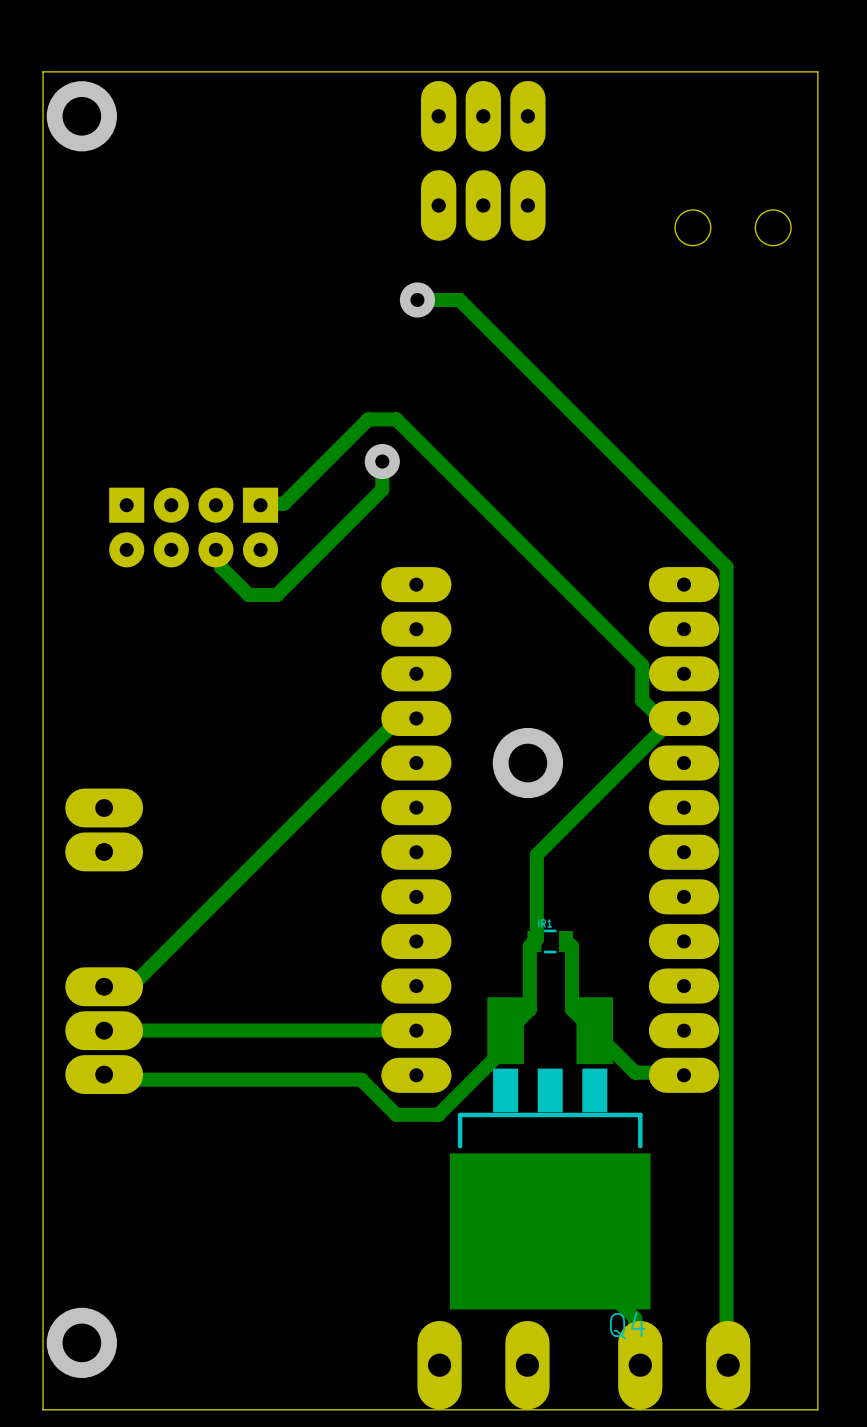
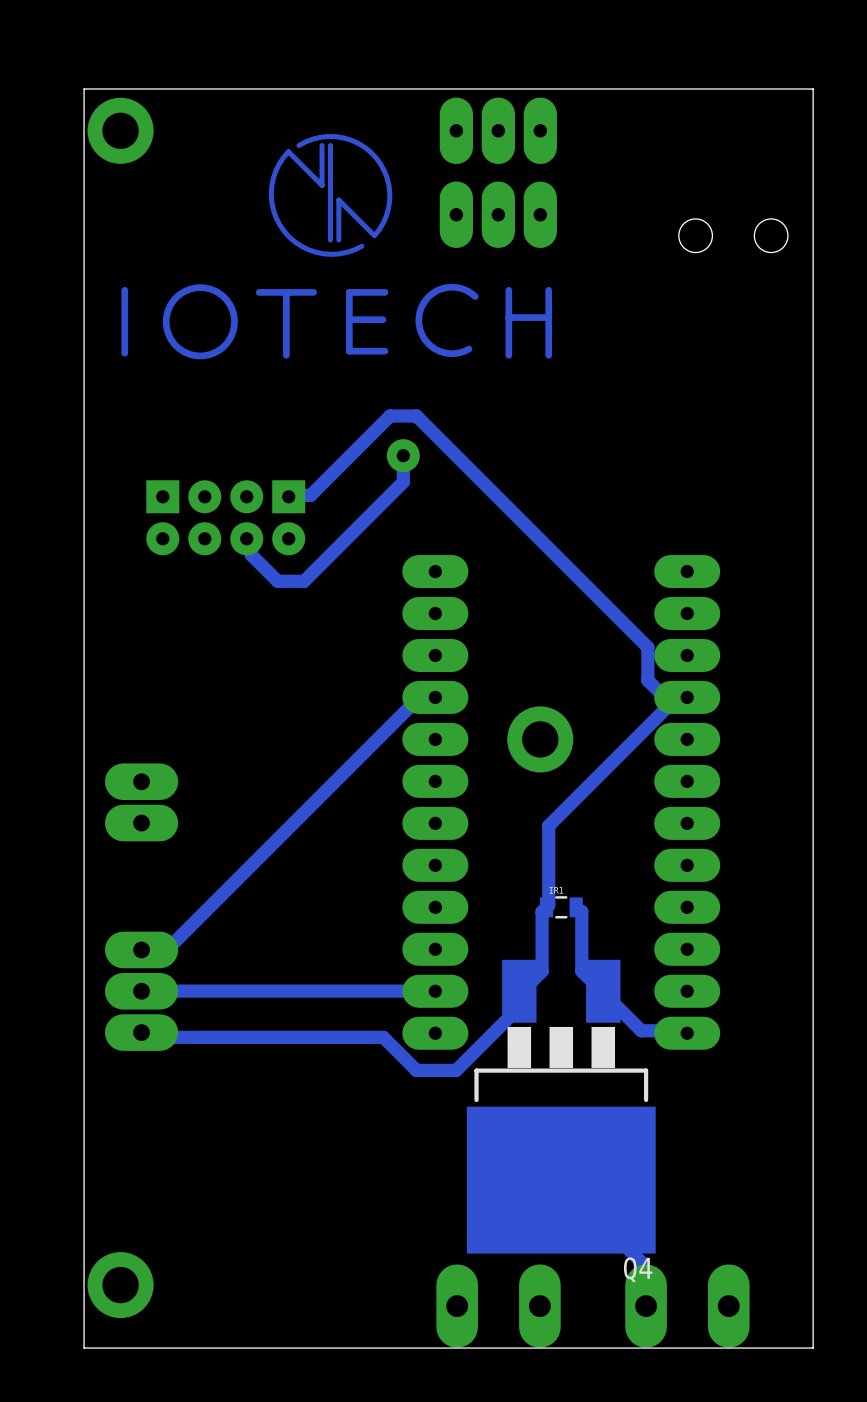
drawing: none -> [121, 133, 553, 360]
track: (417, 299) (459, 299) (726, 566) (726, 1360) (728, 1365) -> none
via: (417, 299) -> none

